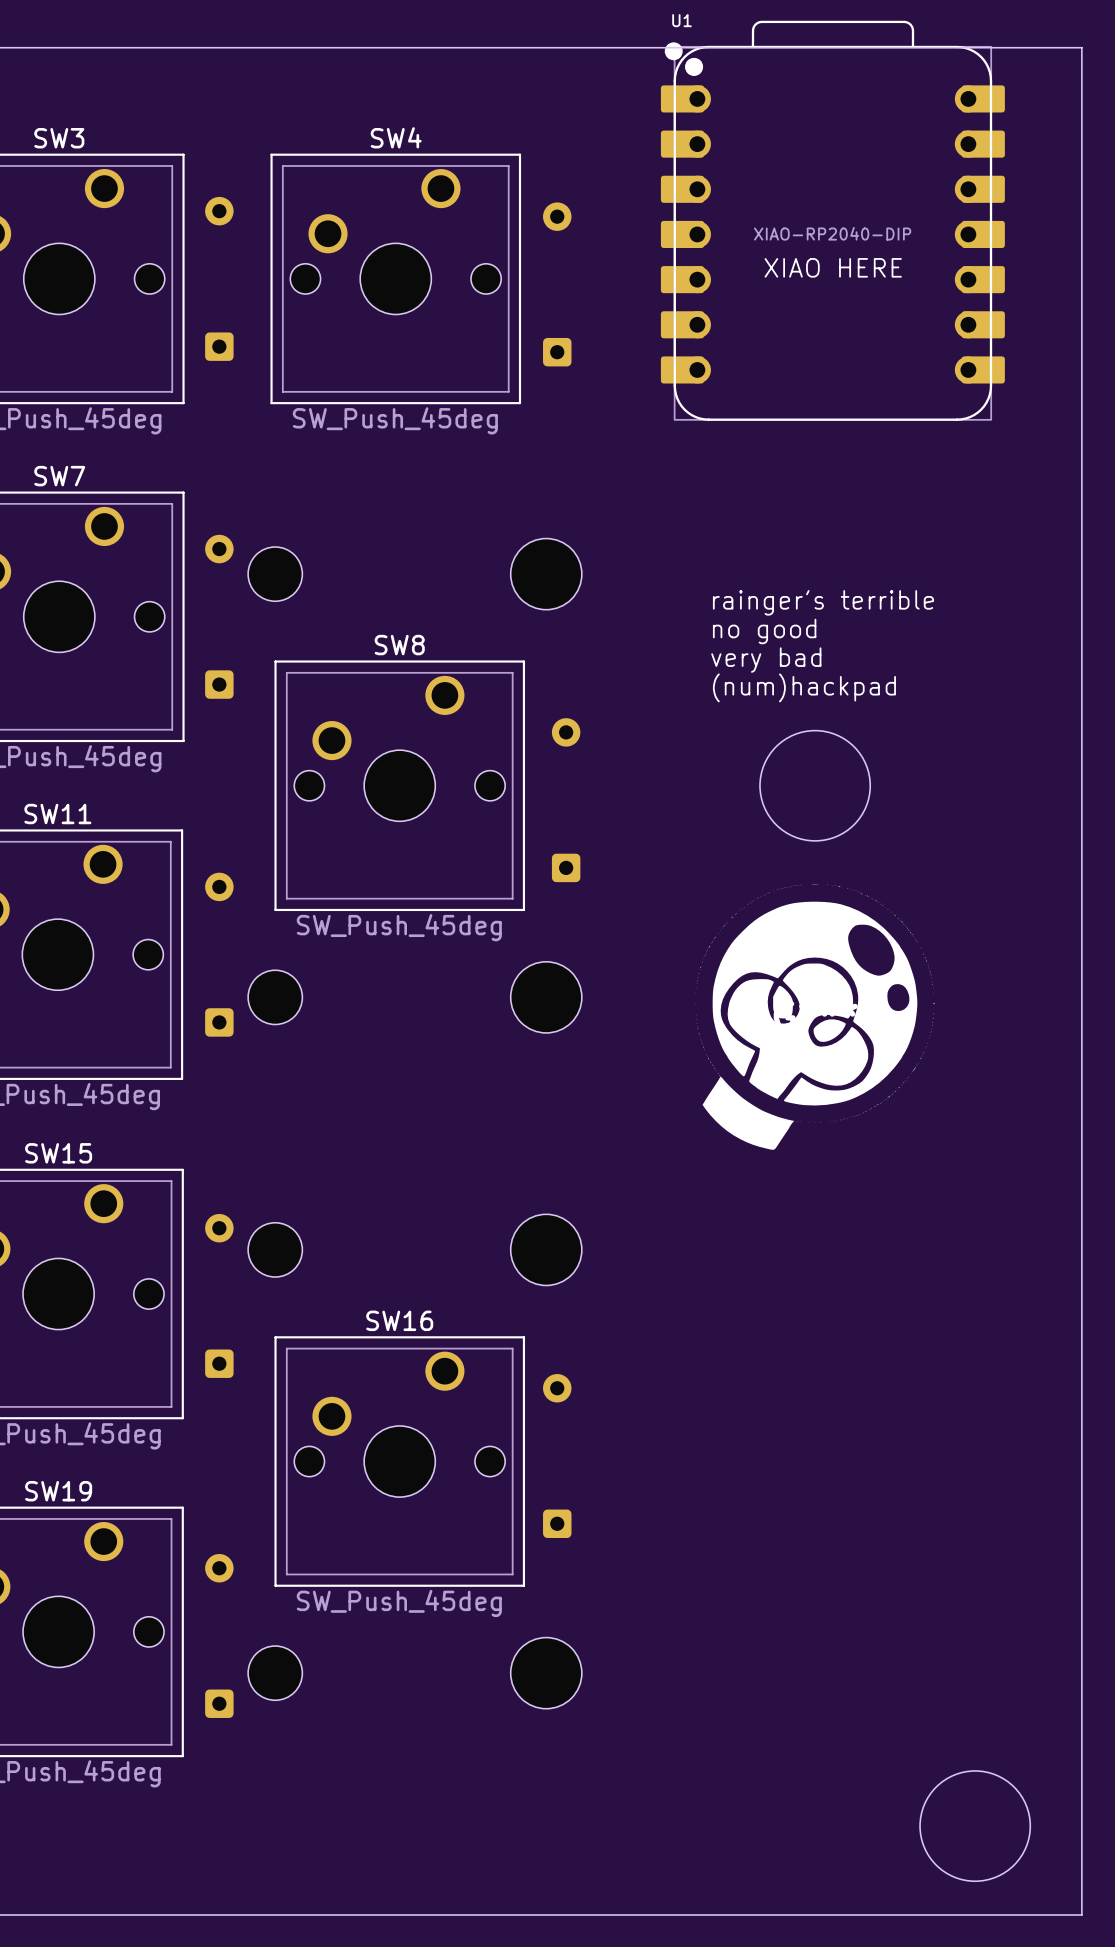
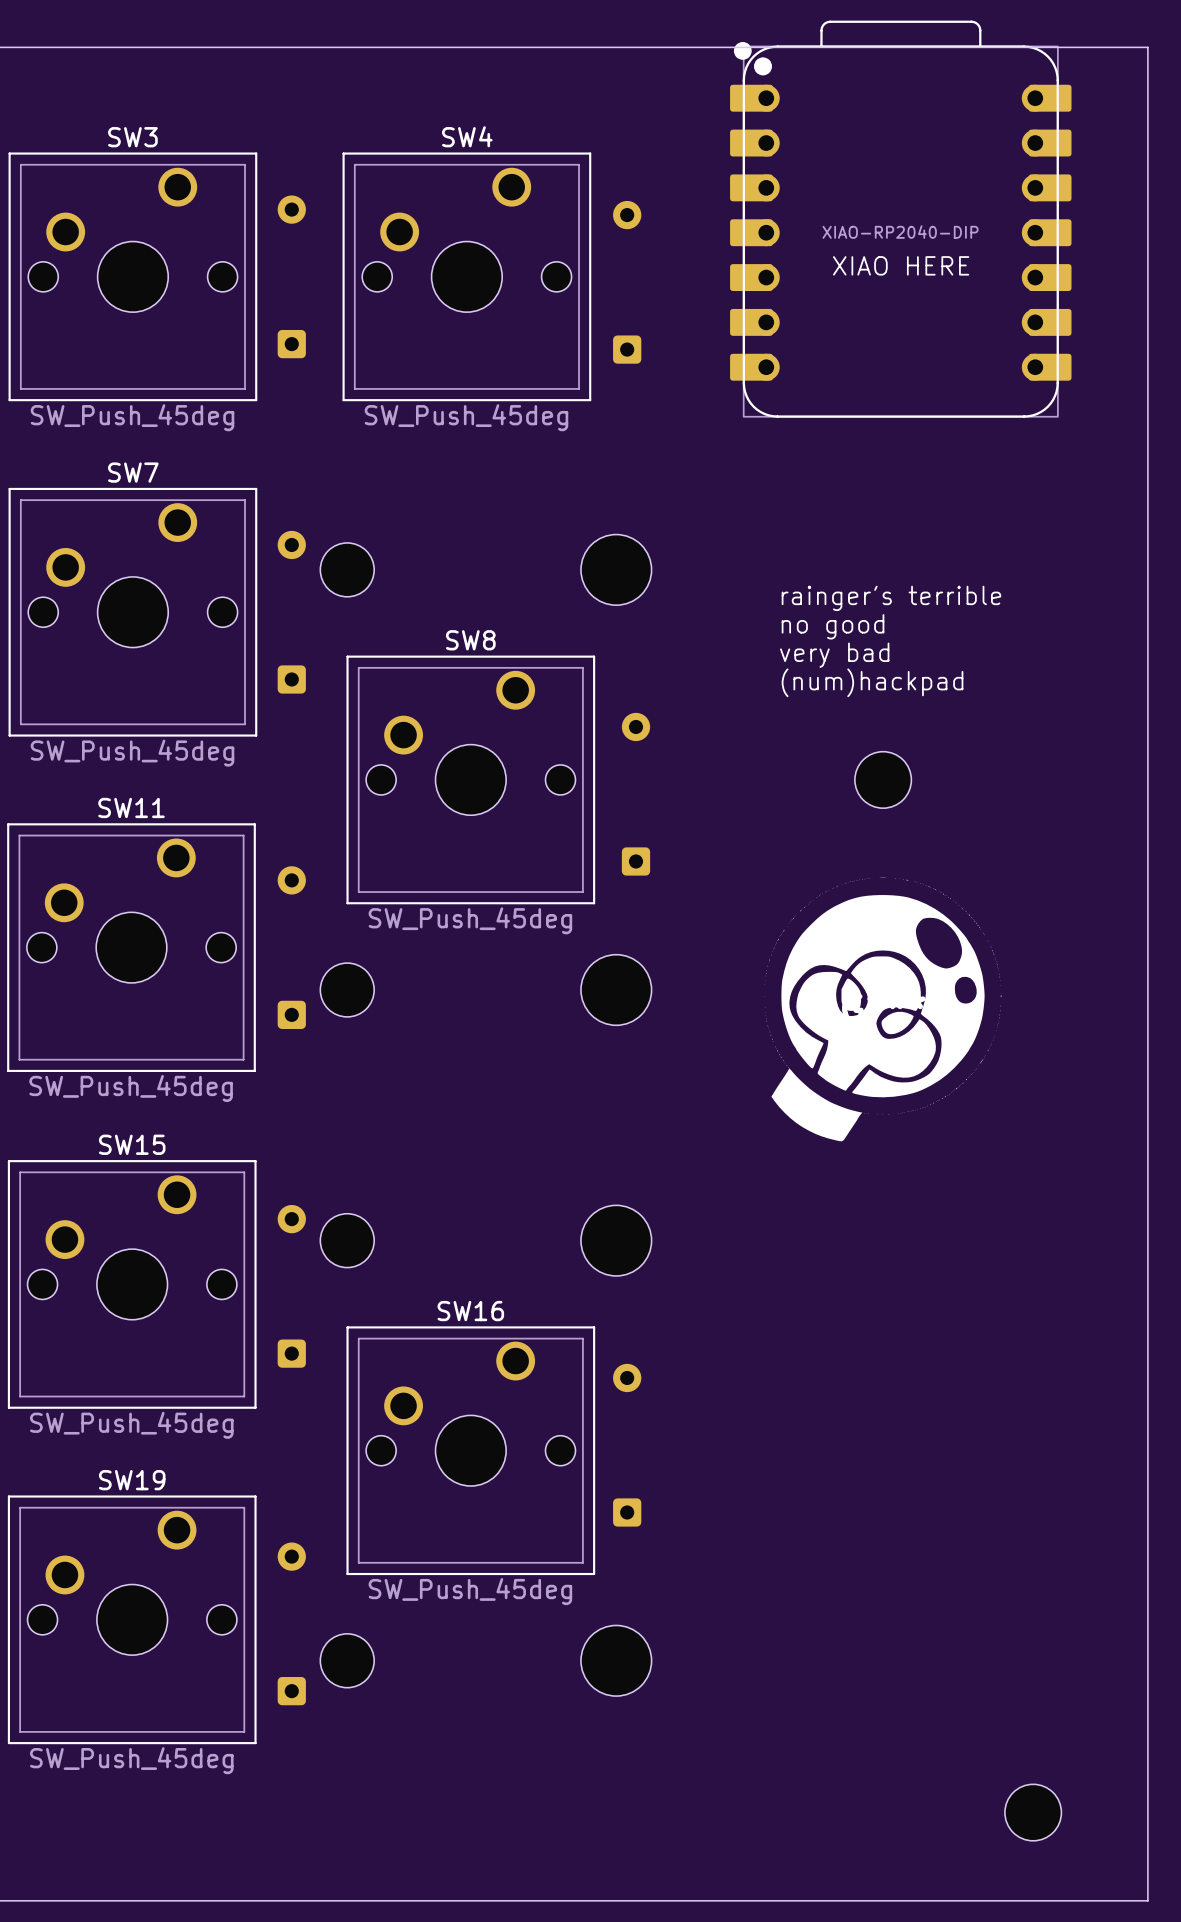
U1 name: U1 (682, 20) -> none
round board edge: [759, 730, 871, 842] -> none
part: none -> (883, 779)
round board edge: [919, 1770, 1031, 1882] -> none
part: none -> (1033, 1812)

